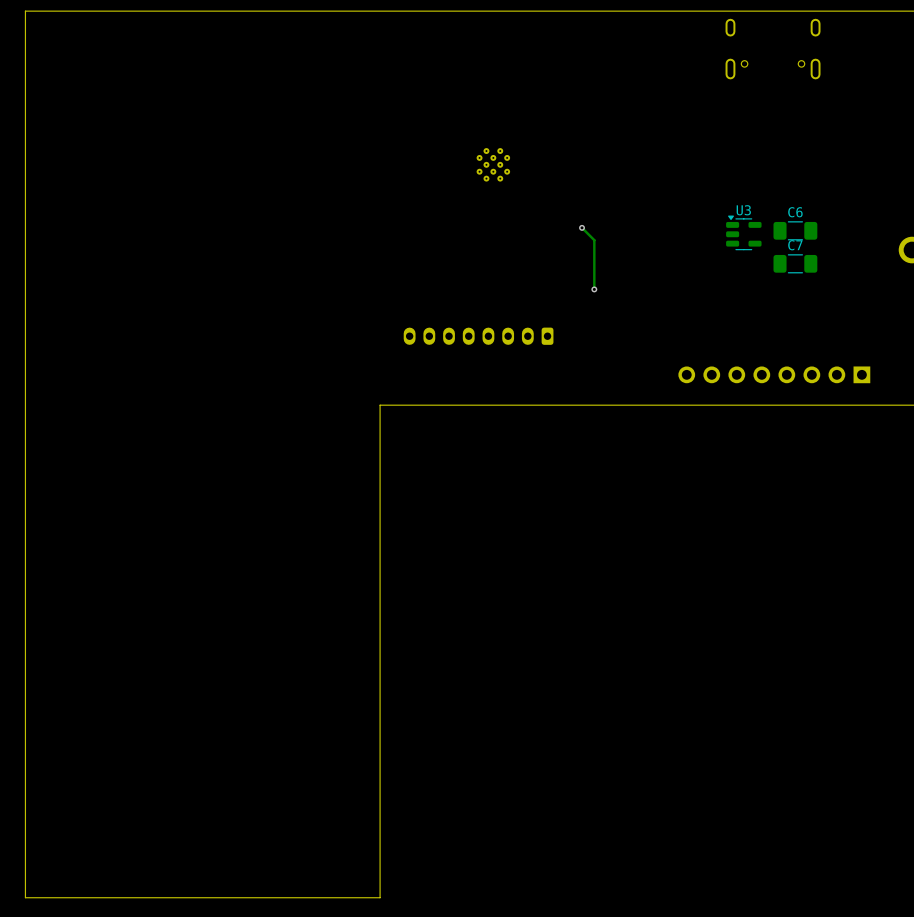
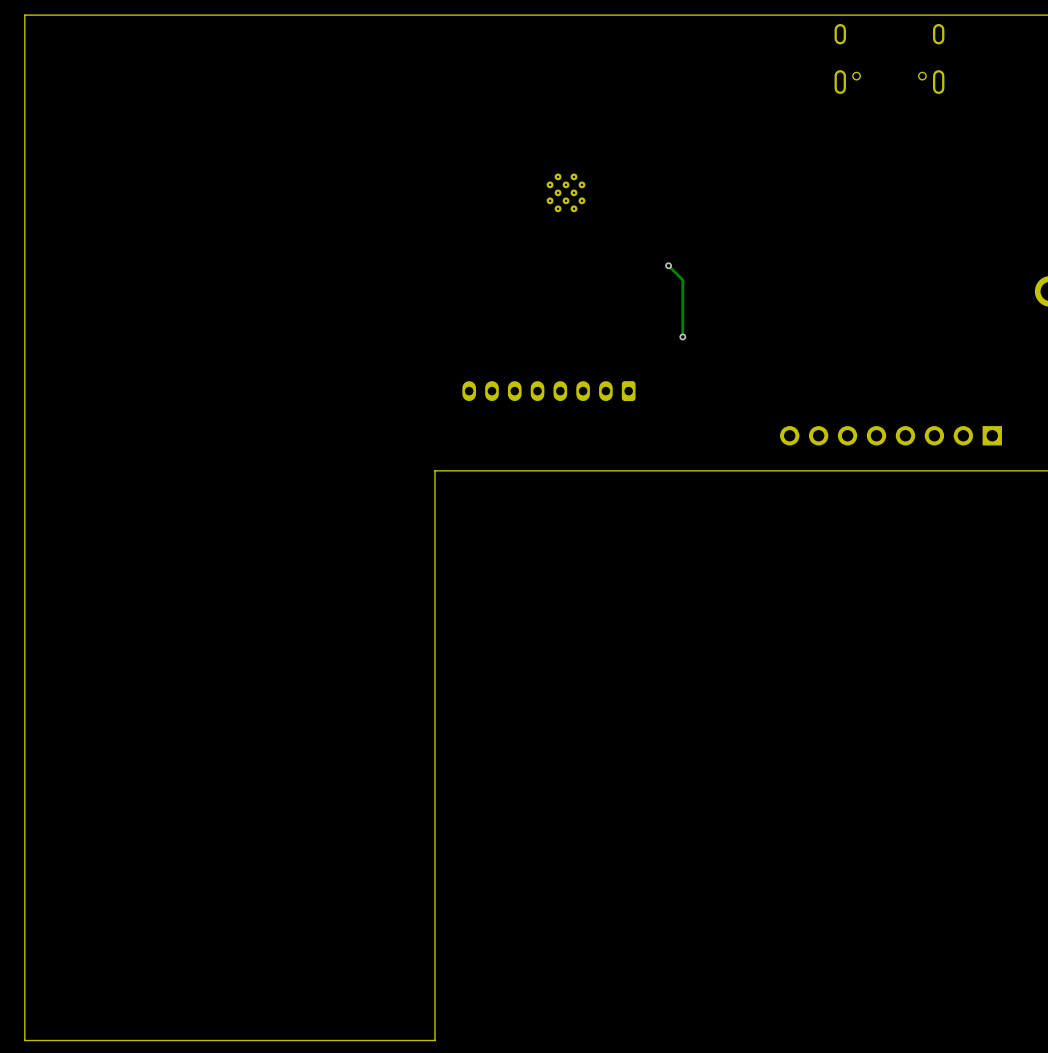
C6: (795, 230) -> none
U3: (743, 232) -> none
C7: (795, 263) -> none

